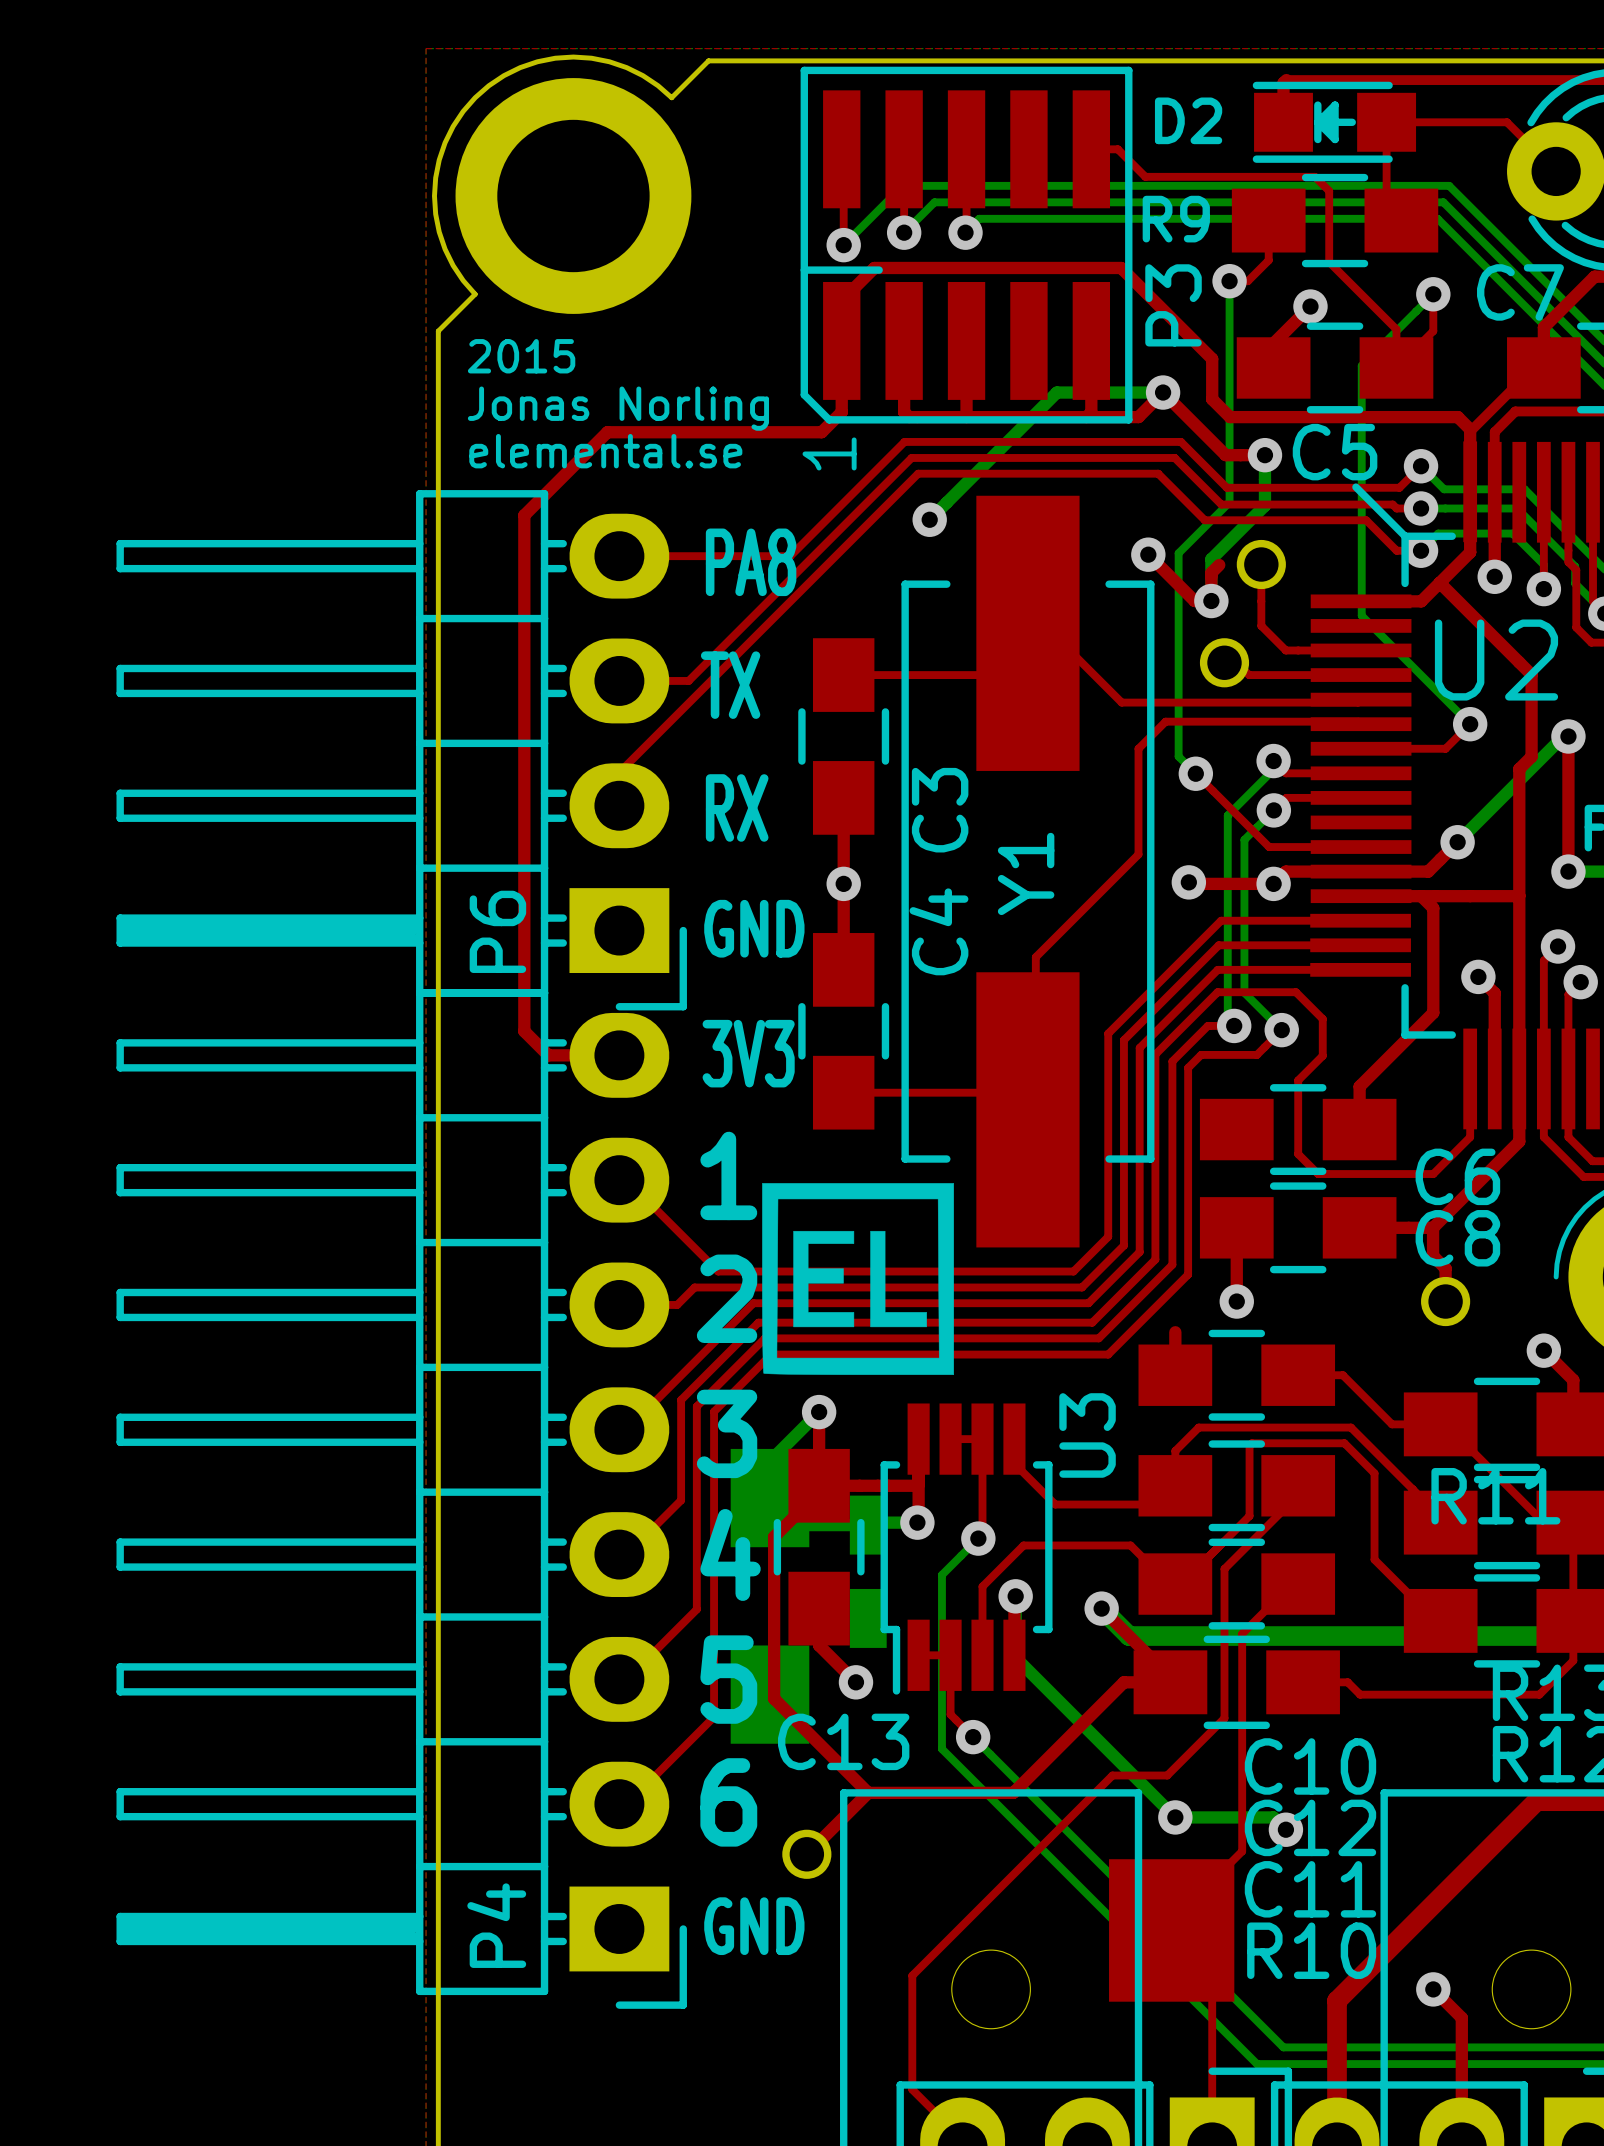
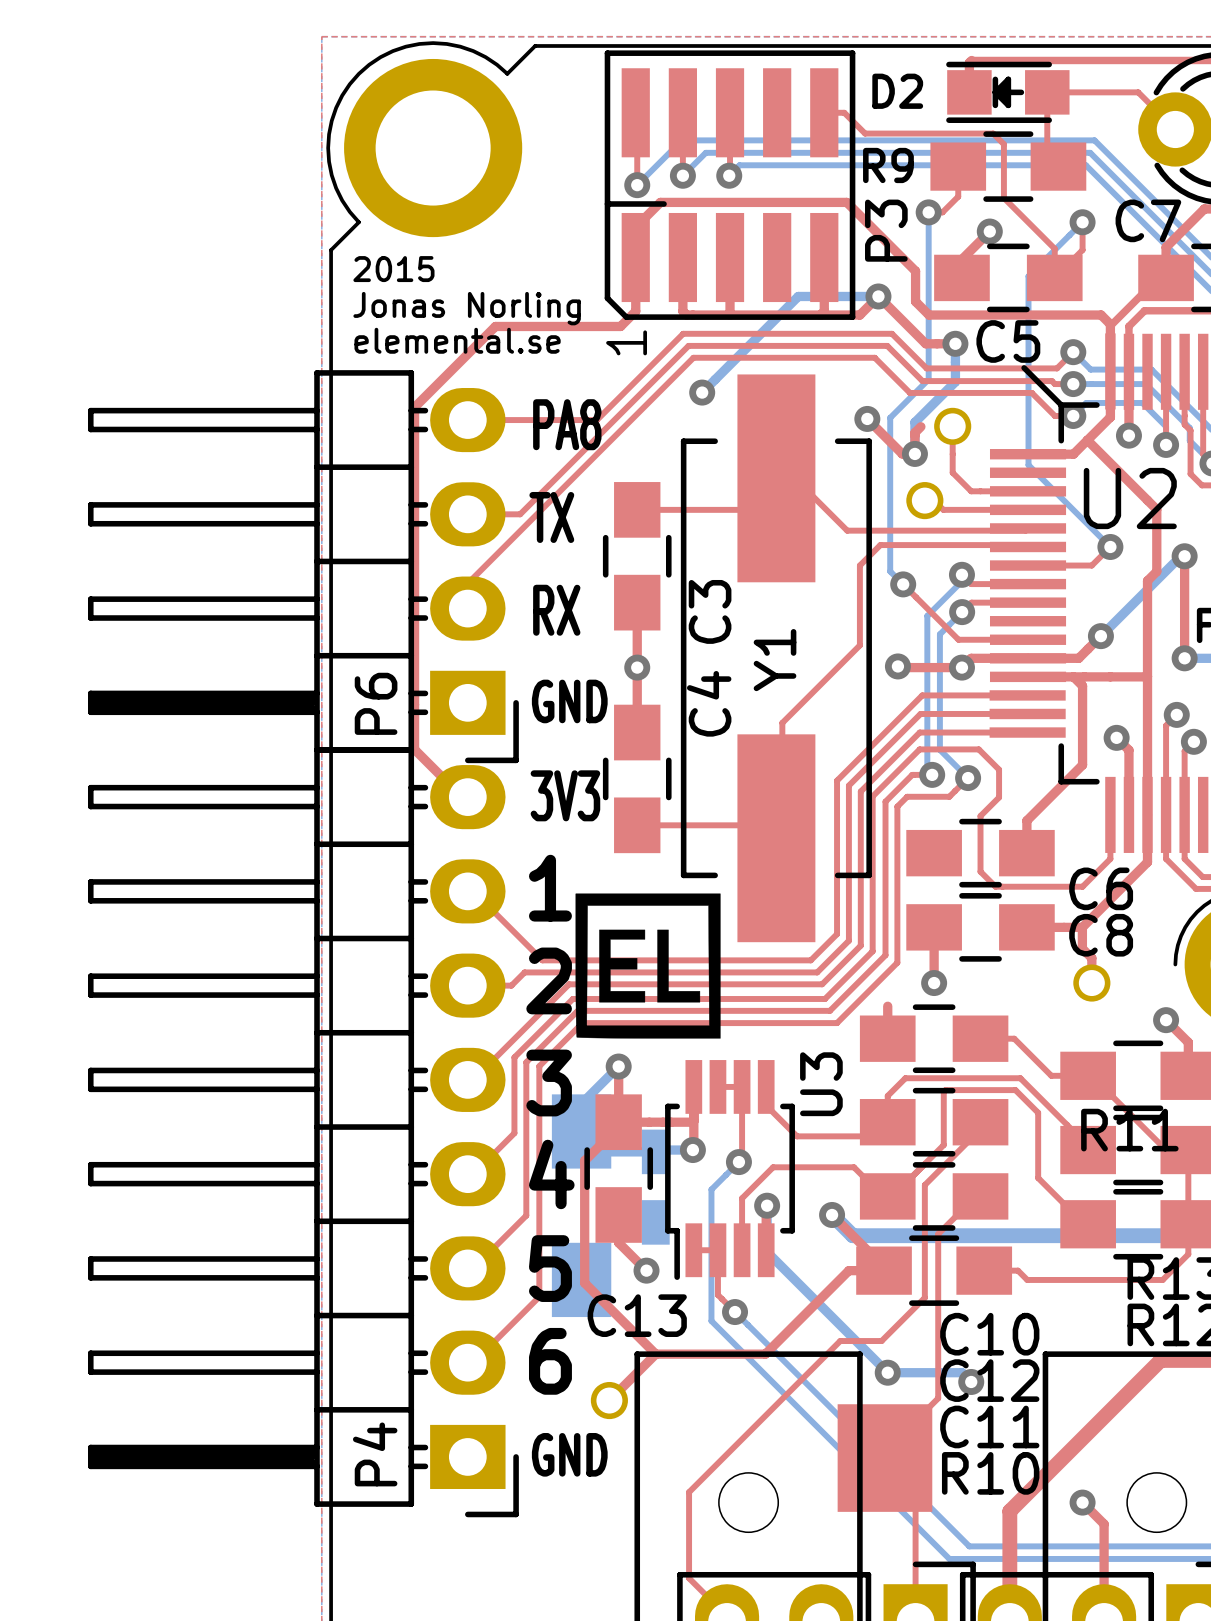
top track: (656, 432) (607, 432) (524, 515) (524, 1031) (548, 1055) (611, 1055) -> (495, 326) (414, 407) (414, 749) (462, 797)

